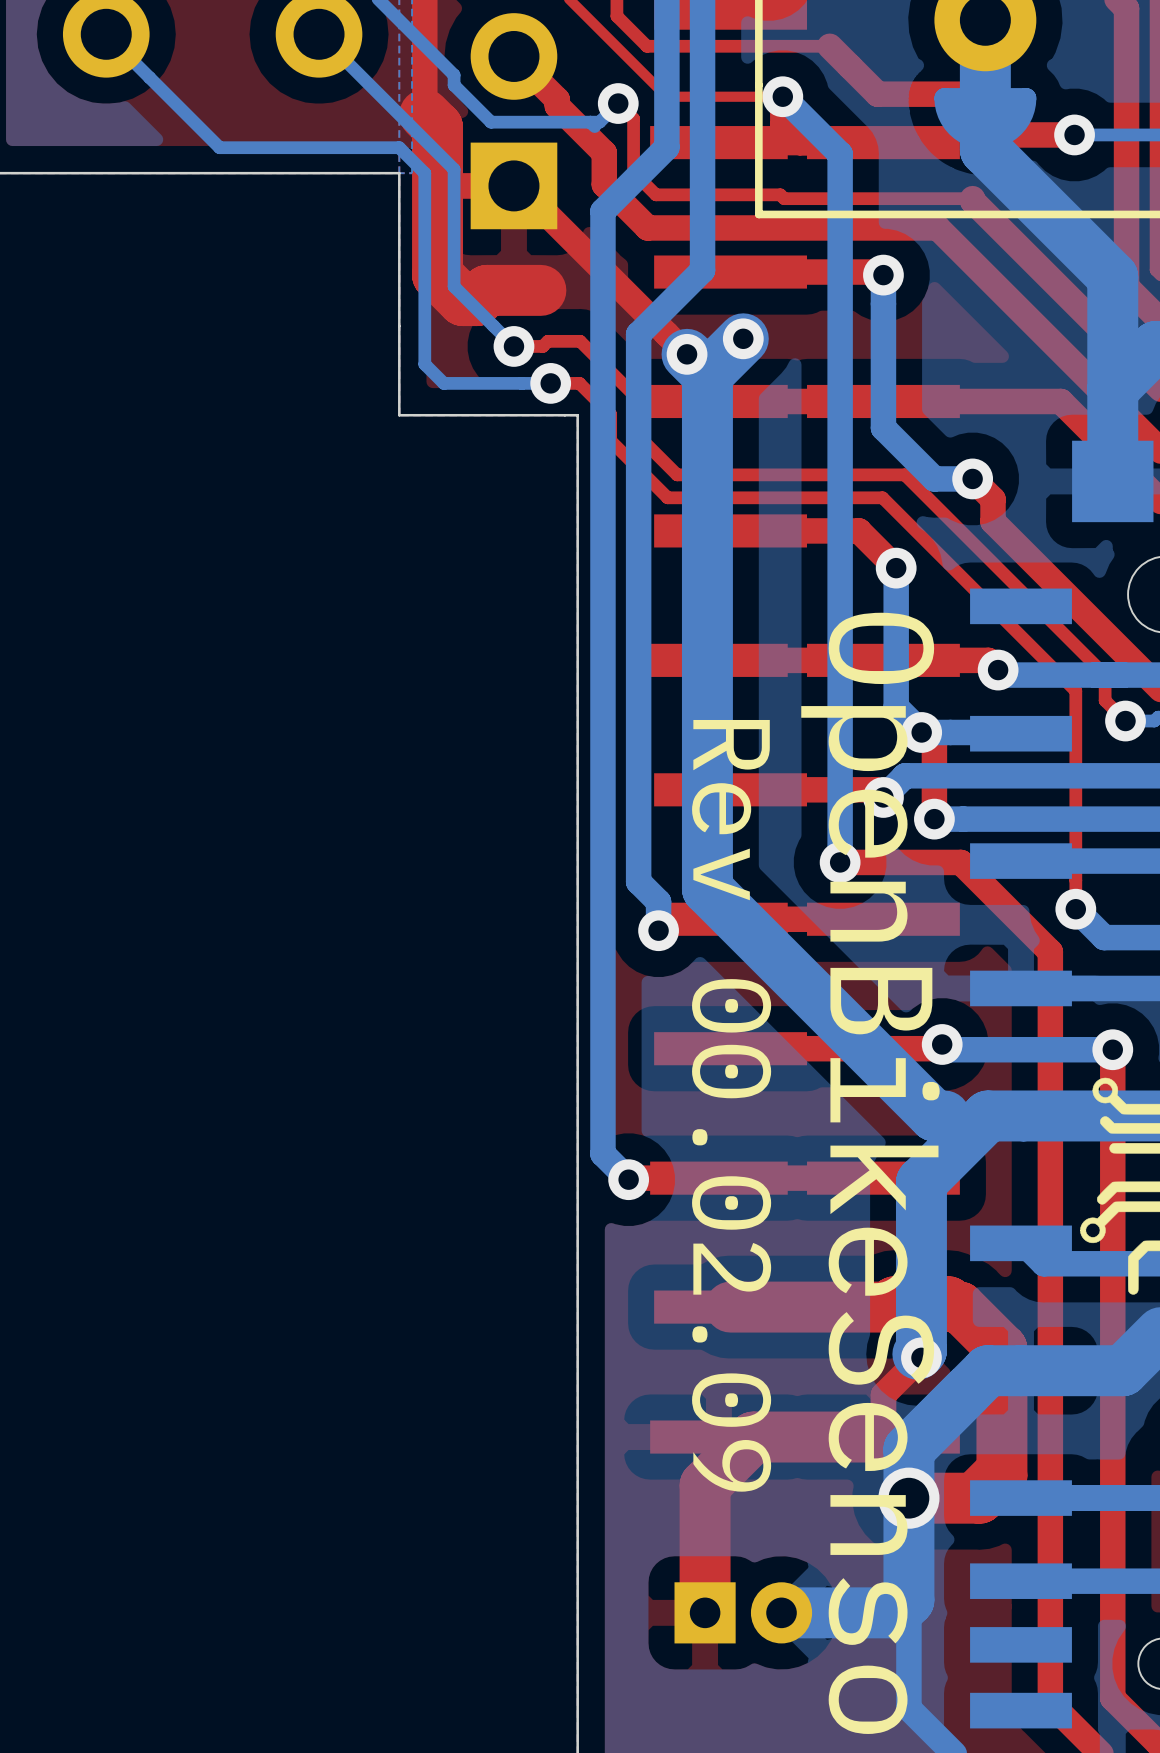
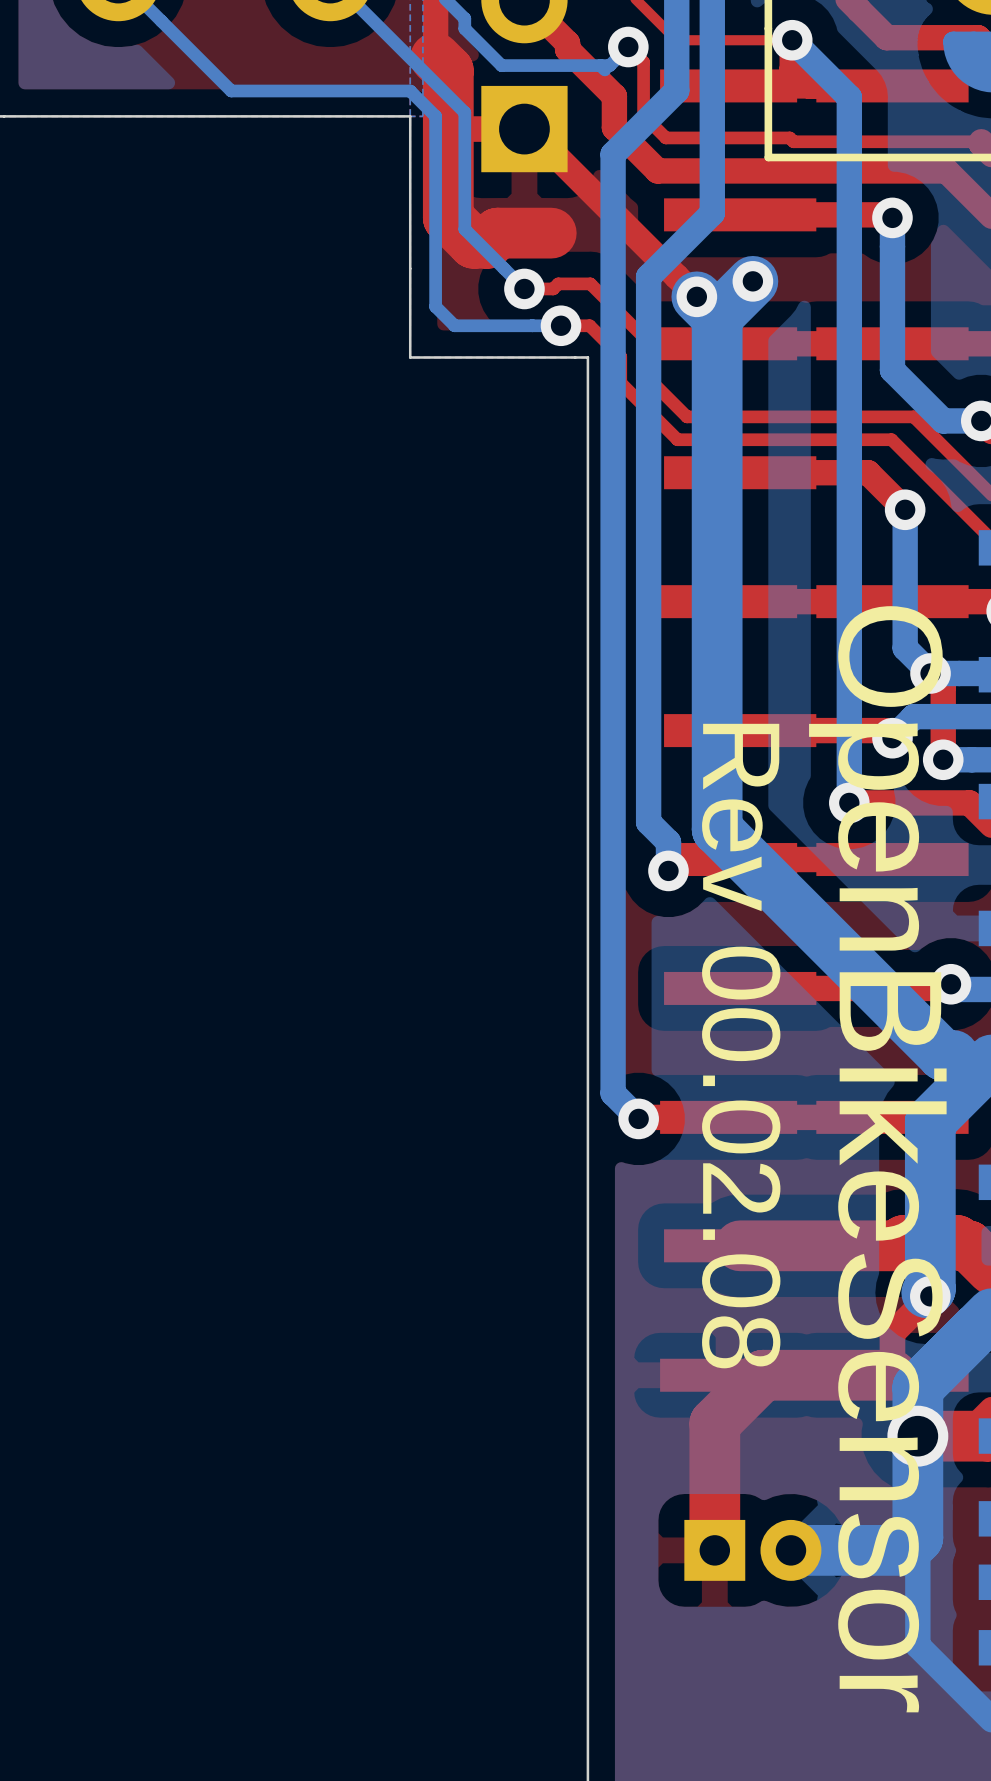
text: Rev 00.02.09 (731, 1105) -> Rev 00.02.08 (741, 1046)

